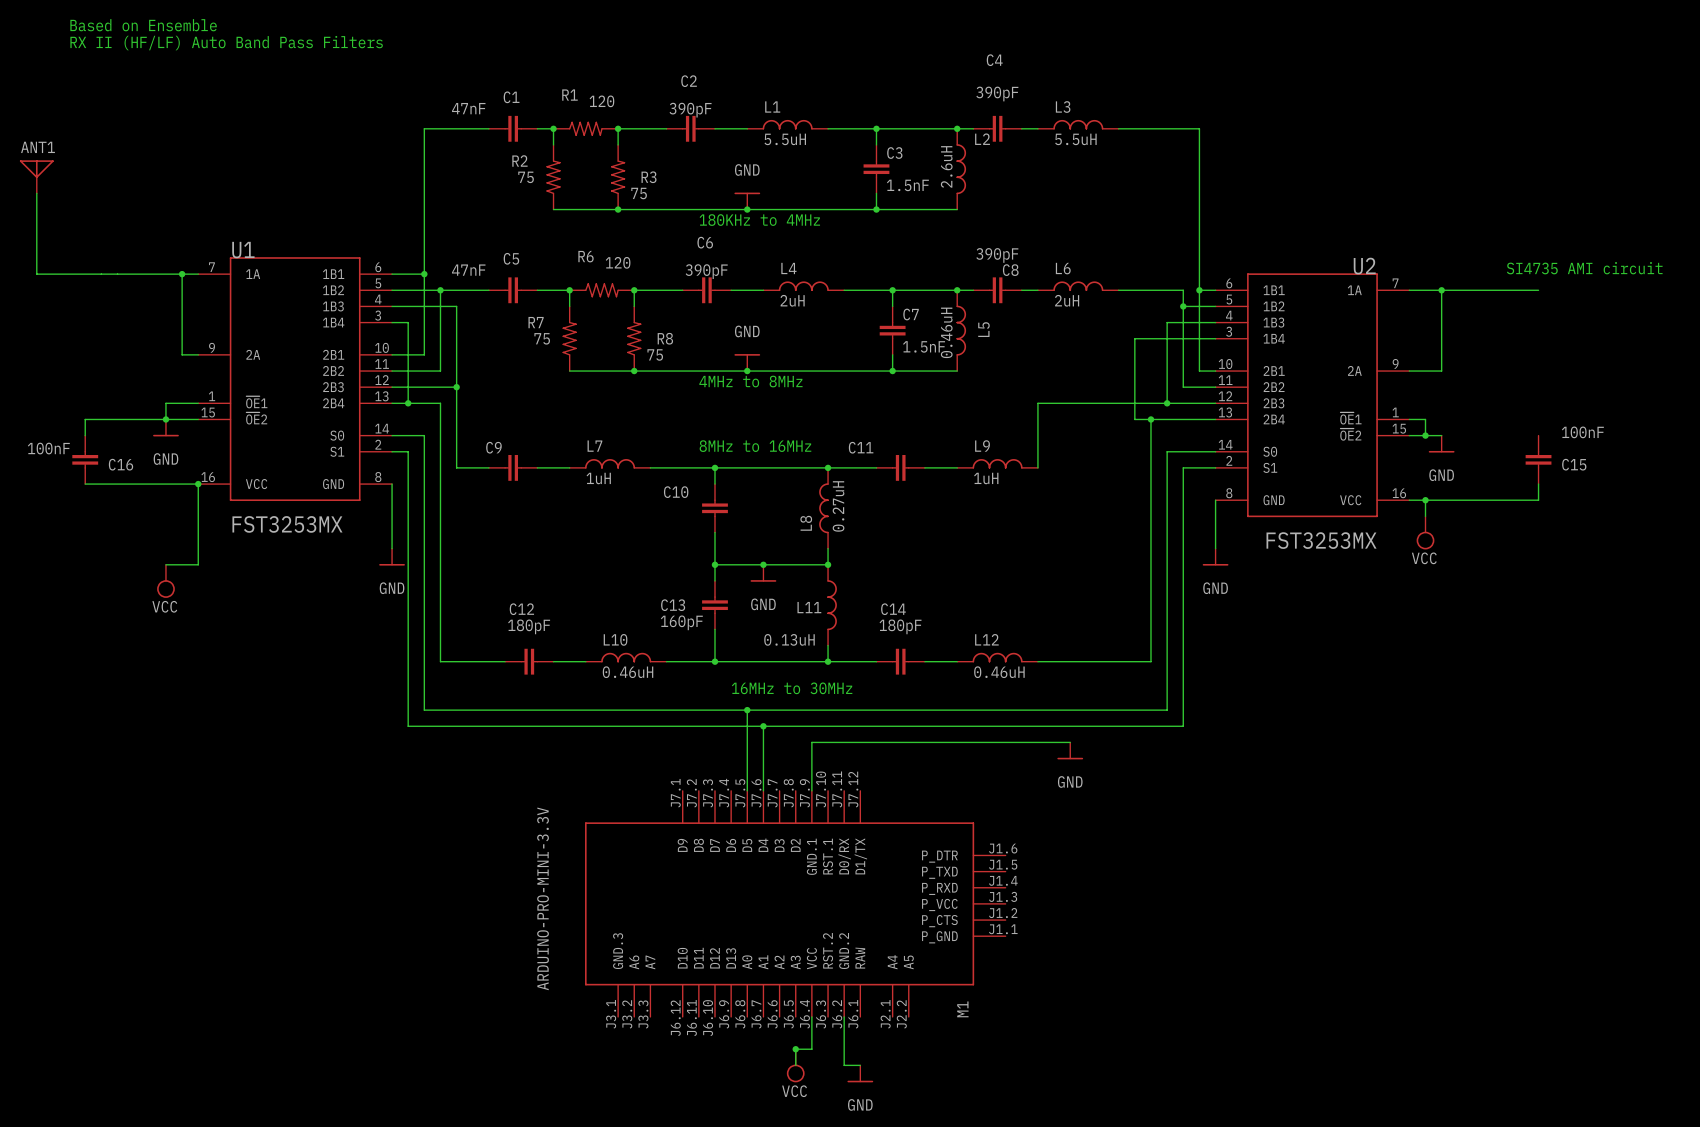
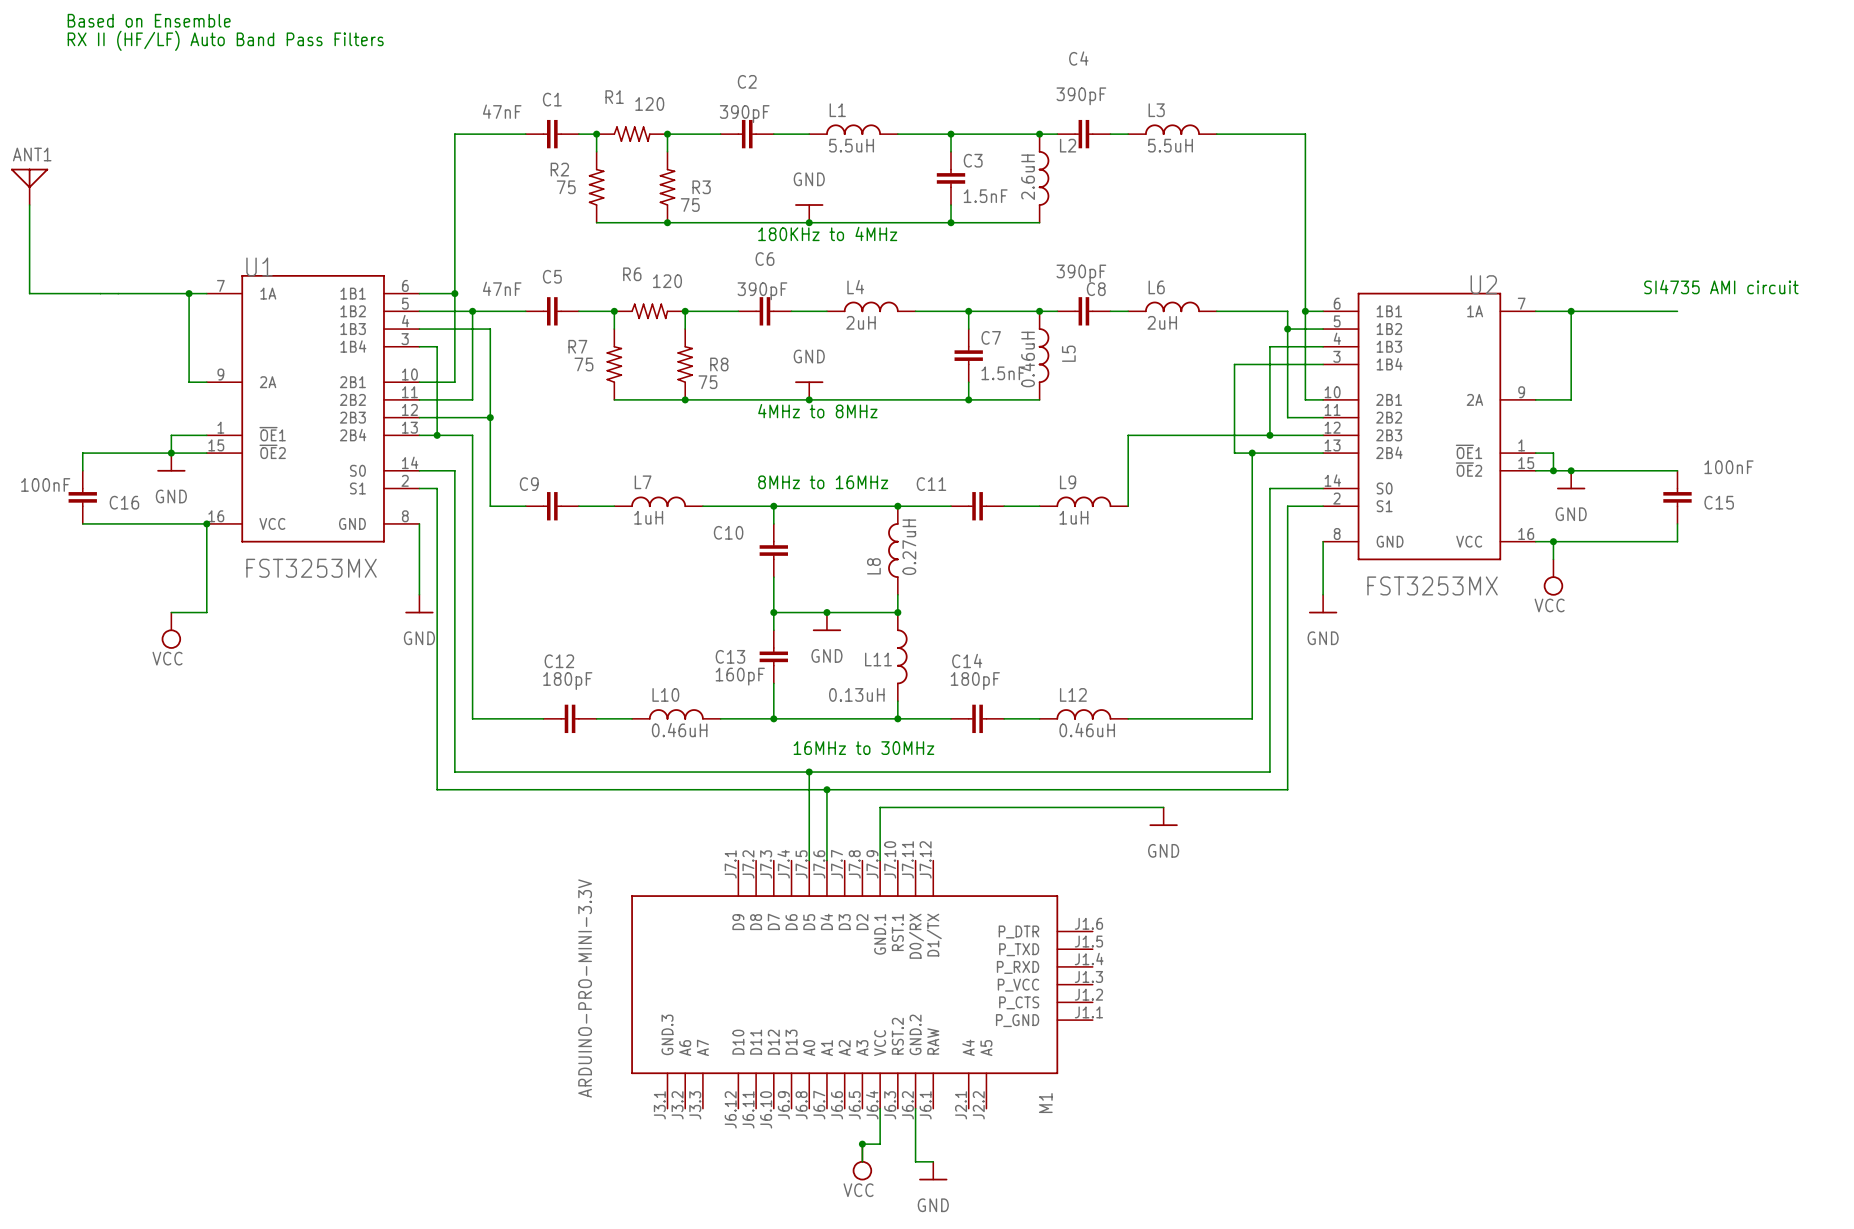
wire: none -> (1571, 470) (1677, 470)
junction: none -> (1571, 470)

